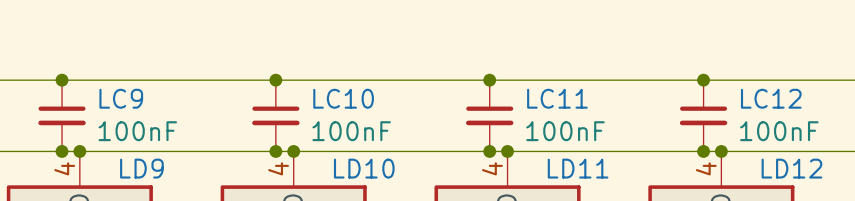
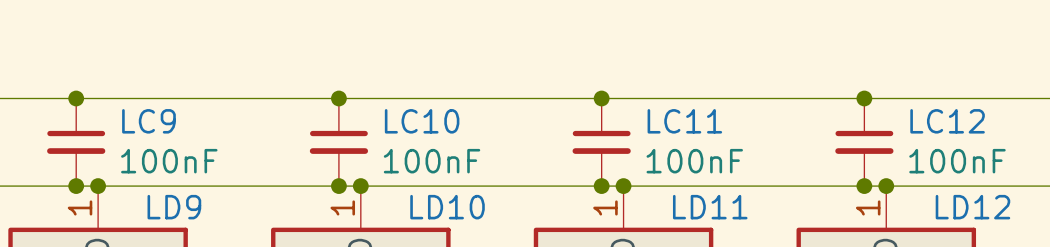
LD9 pin number: 4 (64, 168) -> 1 (80, 207)
LD10 pin number: 4 (278, 168) -> 1 (342, 207)
LD11 pin number: 4 (492, 168) -> 1 (605, 207)
LD12 pin number: 4 (706, 168) -> 1 (868, 207)

